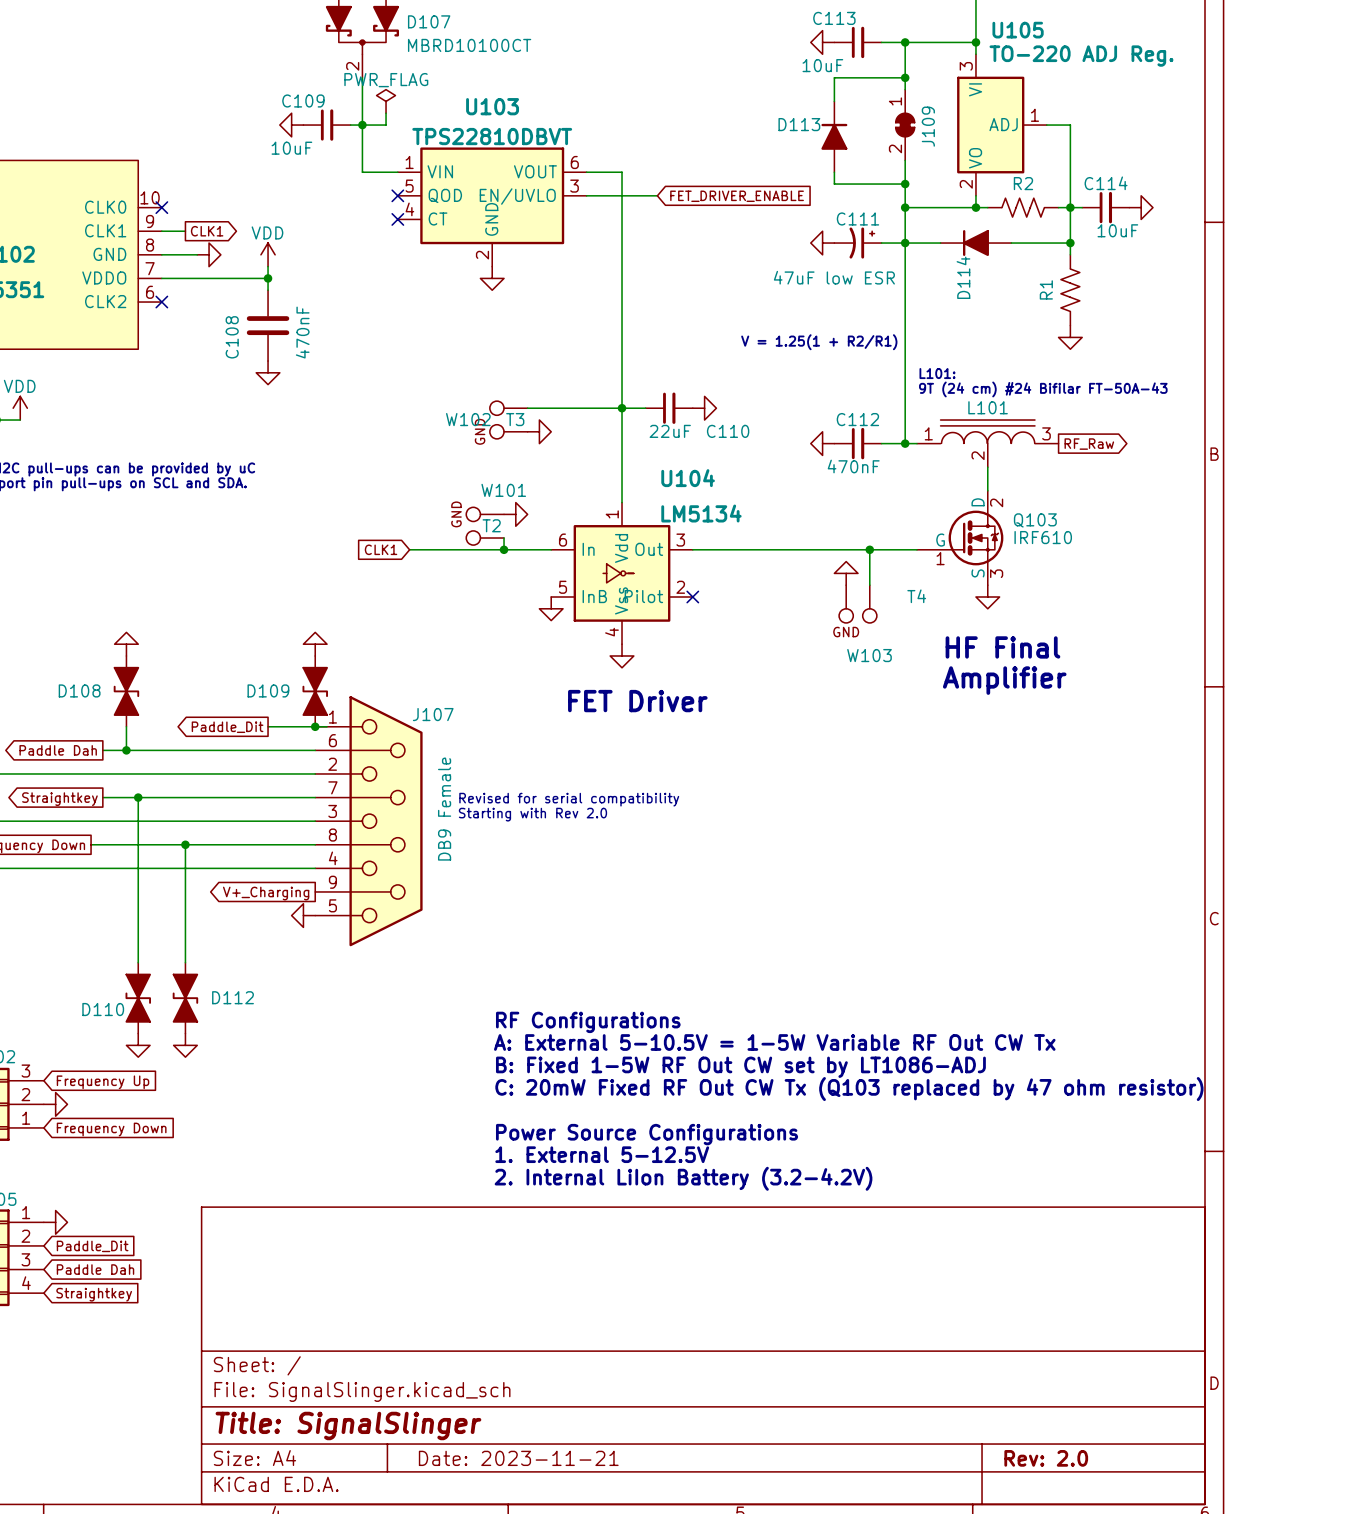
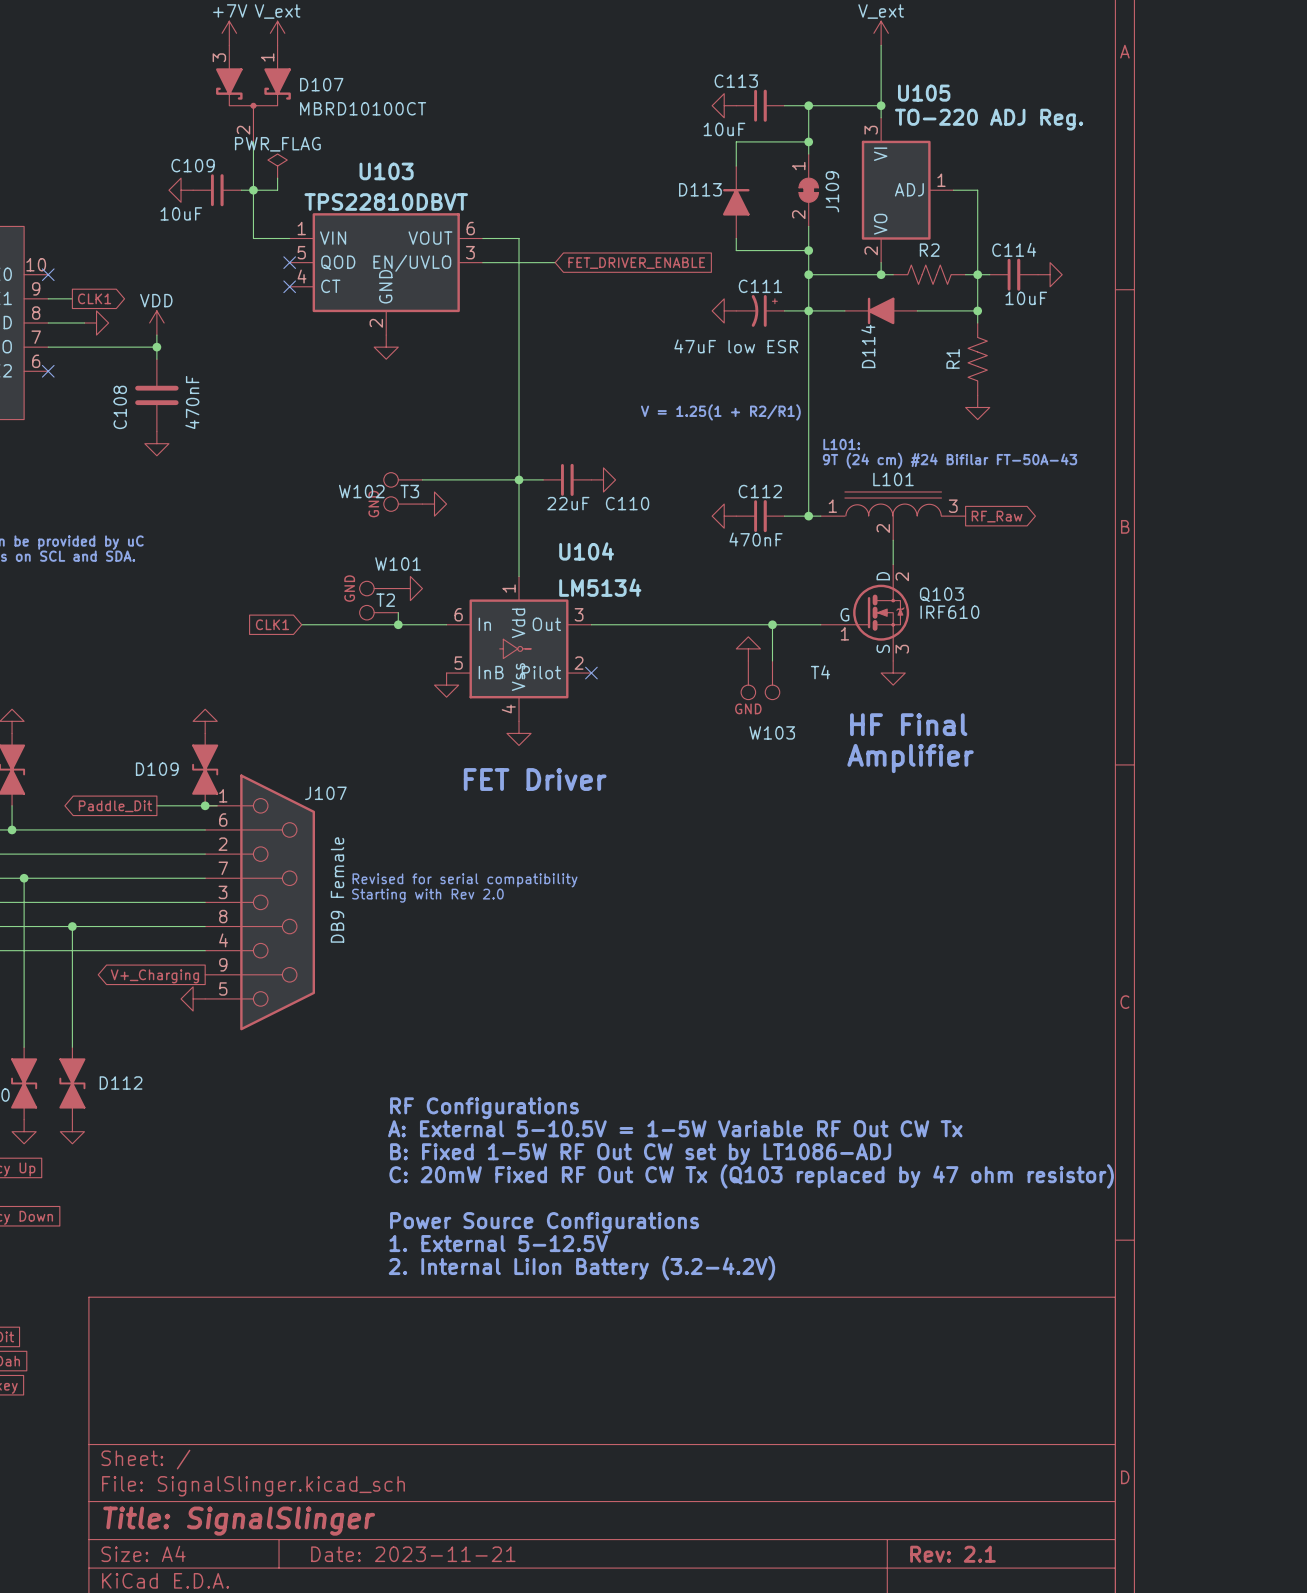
title block: Rev: 2.0 (1046, 1458) -> Rev: 2.1 (952, 1554)

